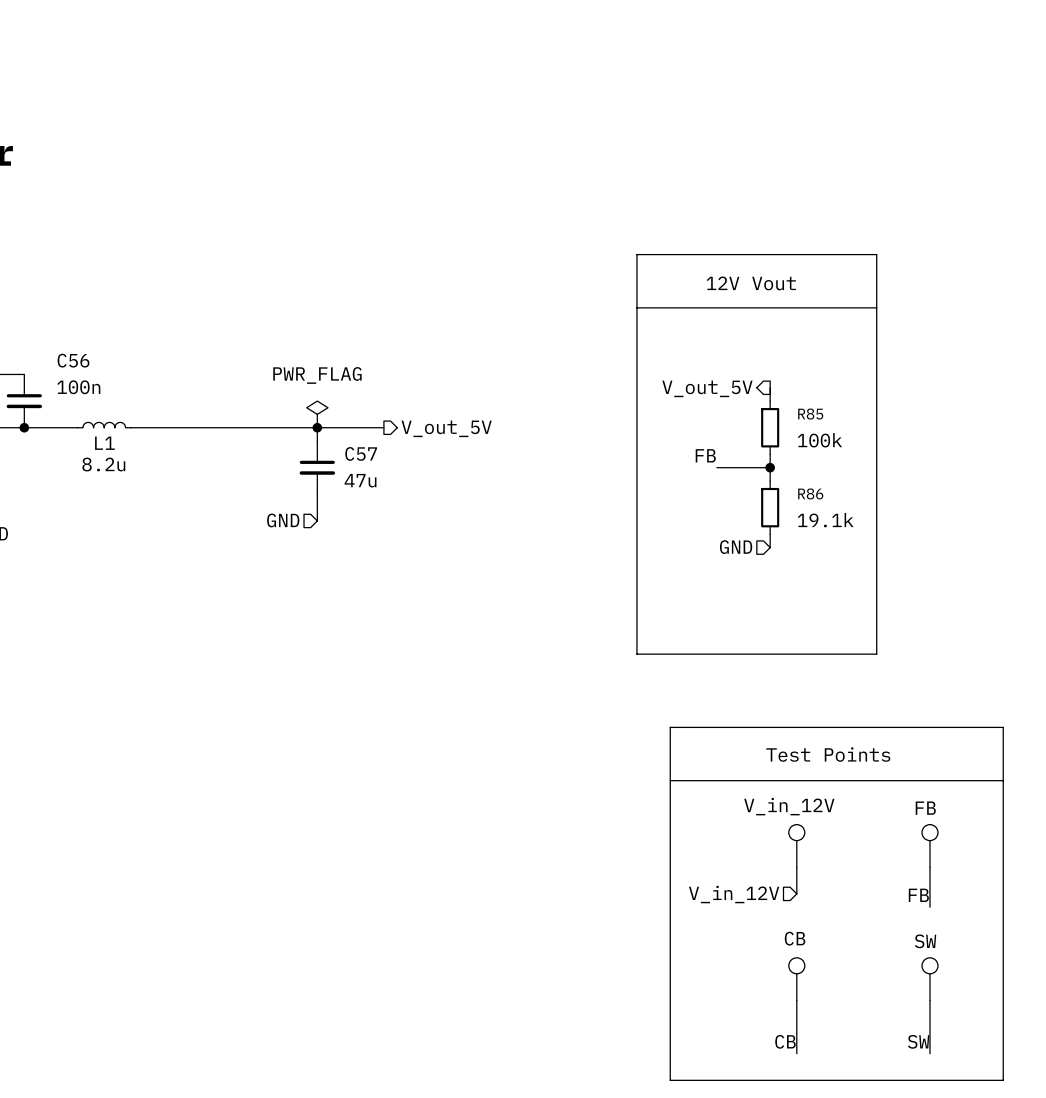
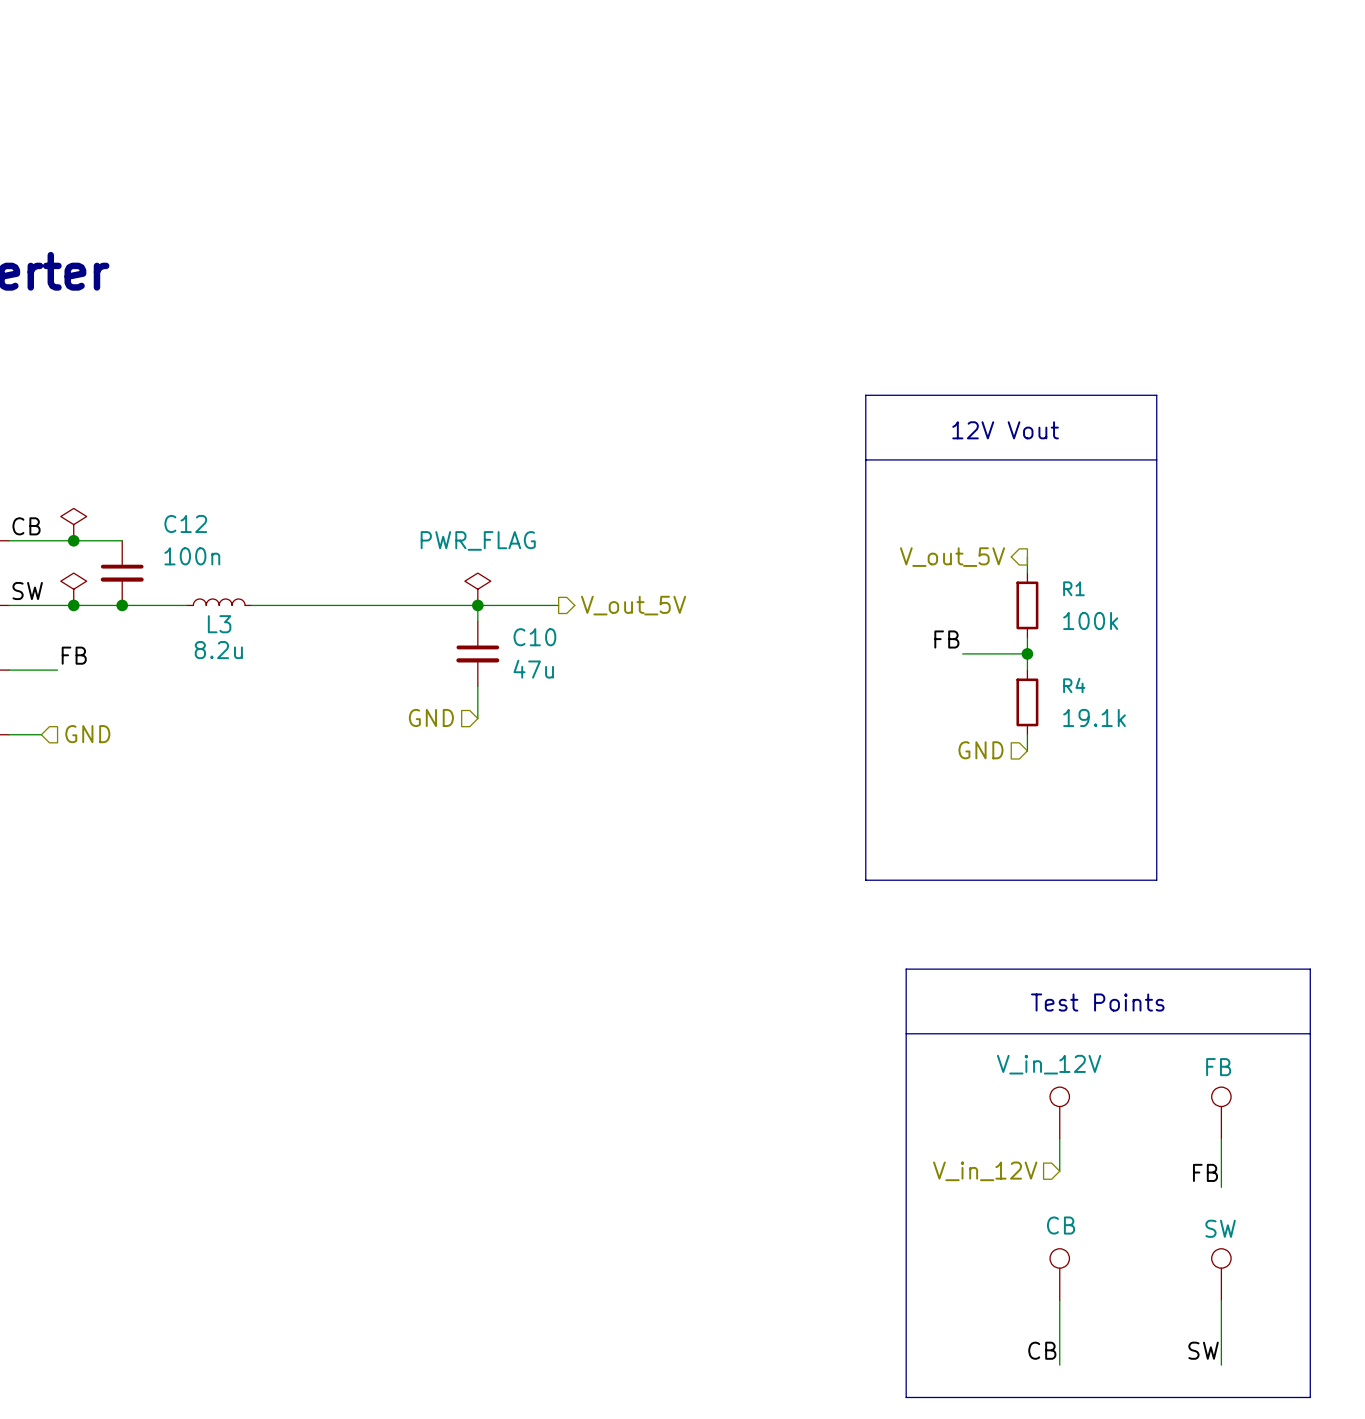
C56 name: C56 (73, 360) -> C12 (185, 524)
R85 name: R85 (810, 414) -> R1 (1073, 588)
L1 name: L1 (104, 443) -> L3 (219, 624)
C57 name: C57 (361, 453) -> C10 (534, 637)
R86 name: R86 (810, 493) -> R4 (1074, 685)

